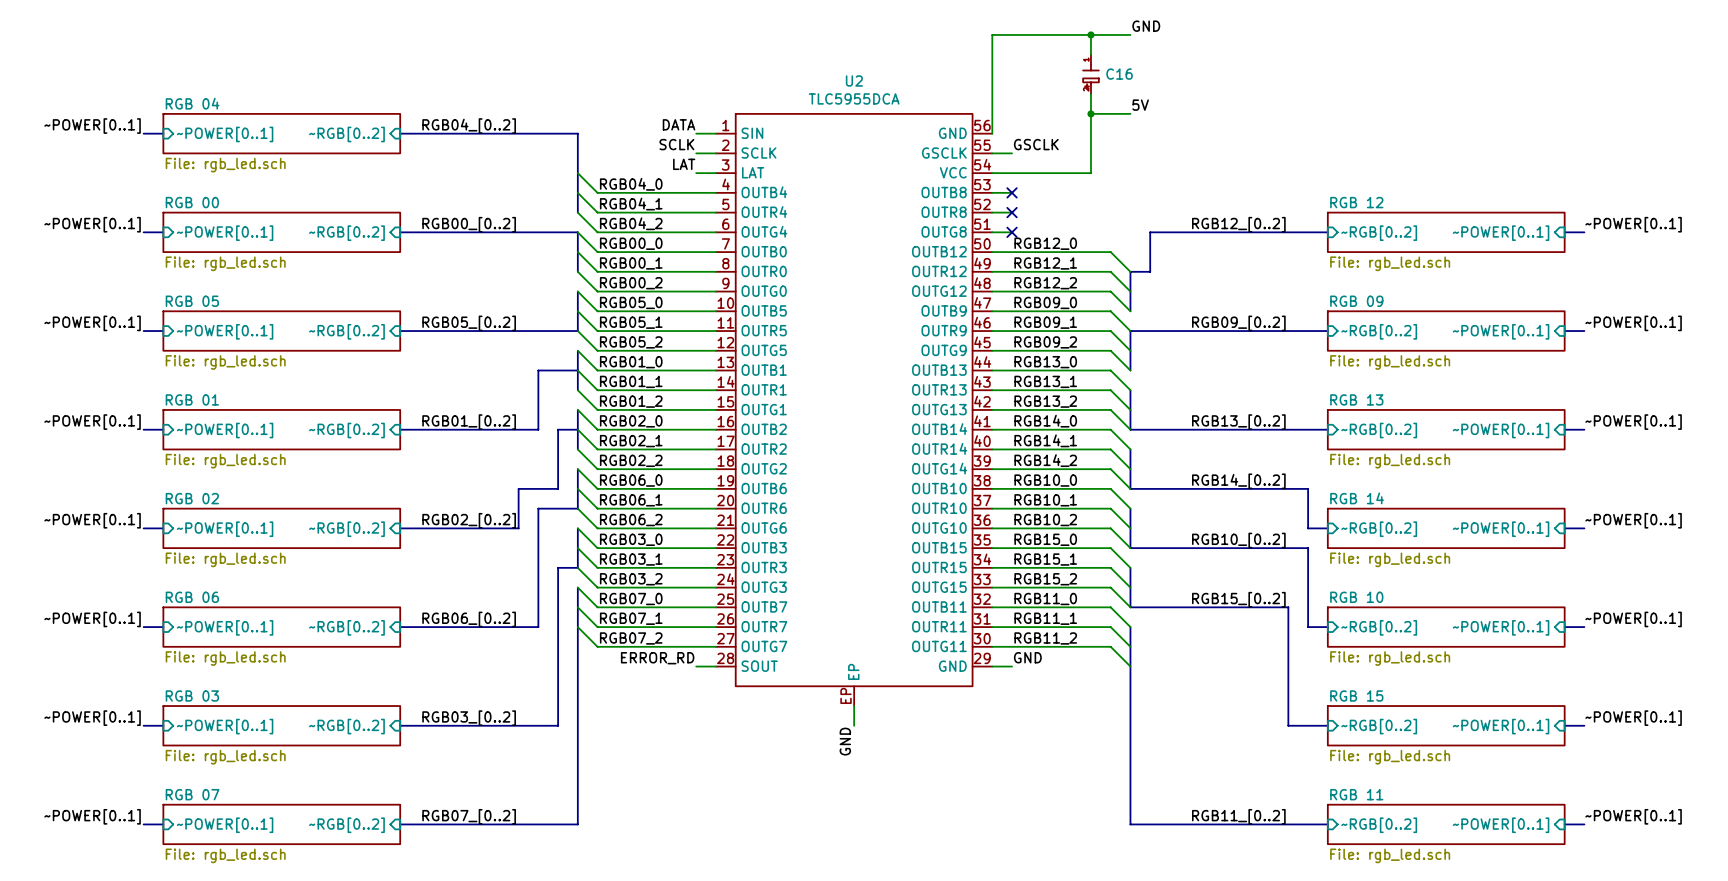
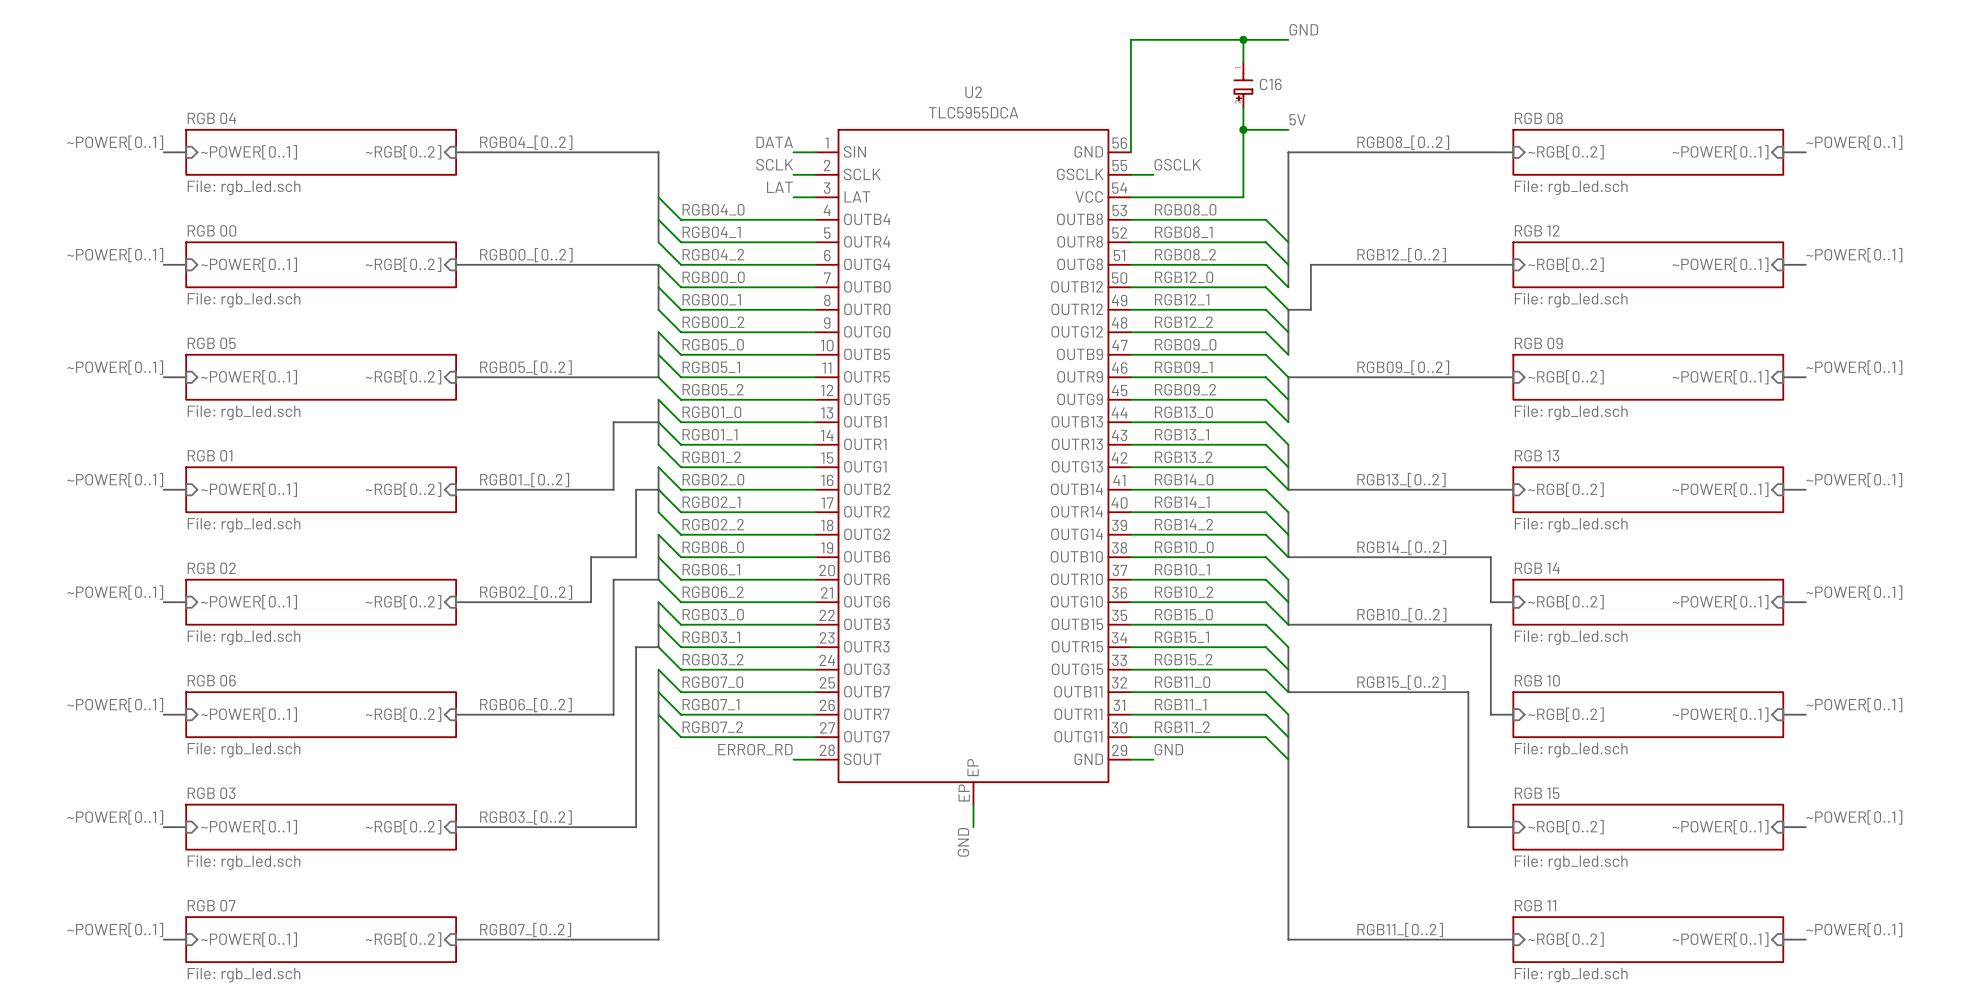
label: none -> RGB08_[0..2] (1403, 142)
label: none -> ~POWER[0..1] (1854, 142)
bus: none -> (1513, 152) (1288, 152) (1288, 287)
sheet RGB 08: none -> File: rgb_led.sch (1648, 152)
bus: none -> (1783, 152) (1805, 152)
sheet pin: none -> ~RGB[0..2] (1565, 152)
sheet pin: none -> ~POWER[0..1] (1720, 152)
label: none -> RGB08_0 (1185, 209)
wire: none -> (1153, 219) (1265, 219) (1288, 242)
no-connect mark: (1012, 192) -> none
label: none -> RGB08_1 (1183, 232)
wire: none -> (1153, 242) (1265, 242) (1288, 264)
no-connect mark: (1012, 212) -> none
label: none -> RGB08_2 (1185, 254)
wire: none -> (1153, 264) (1265, 264) (1288, 287)
no-connect mark: (1012, 232) -> none

